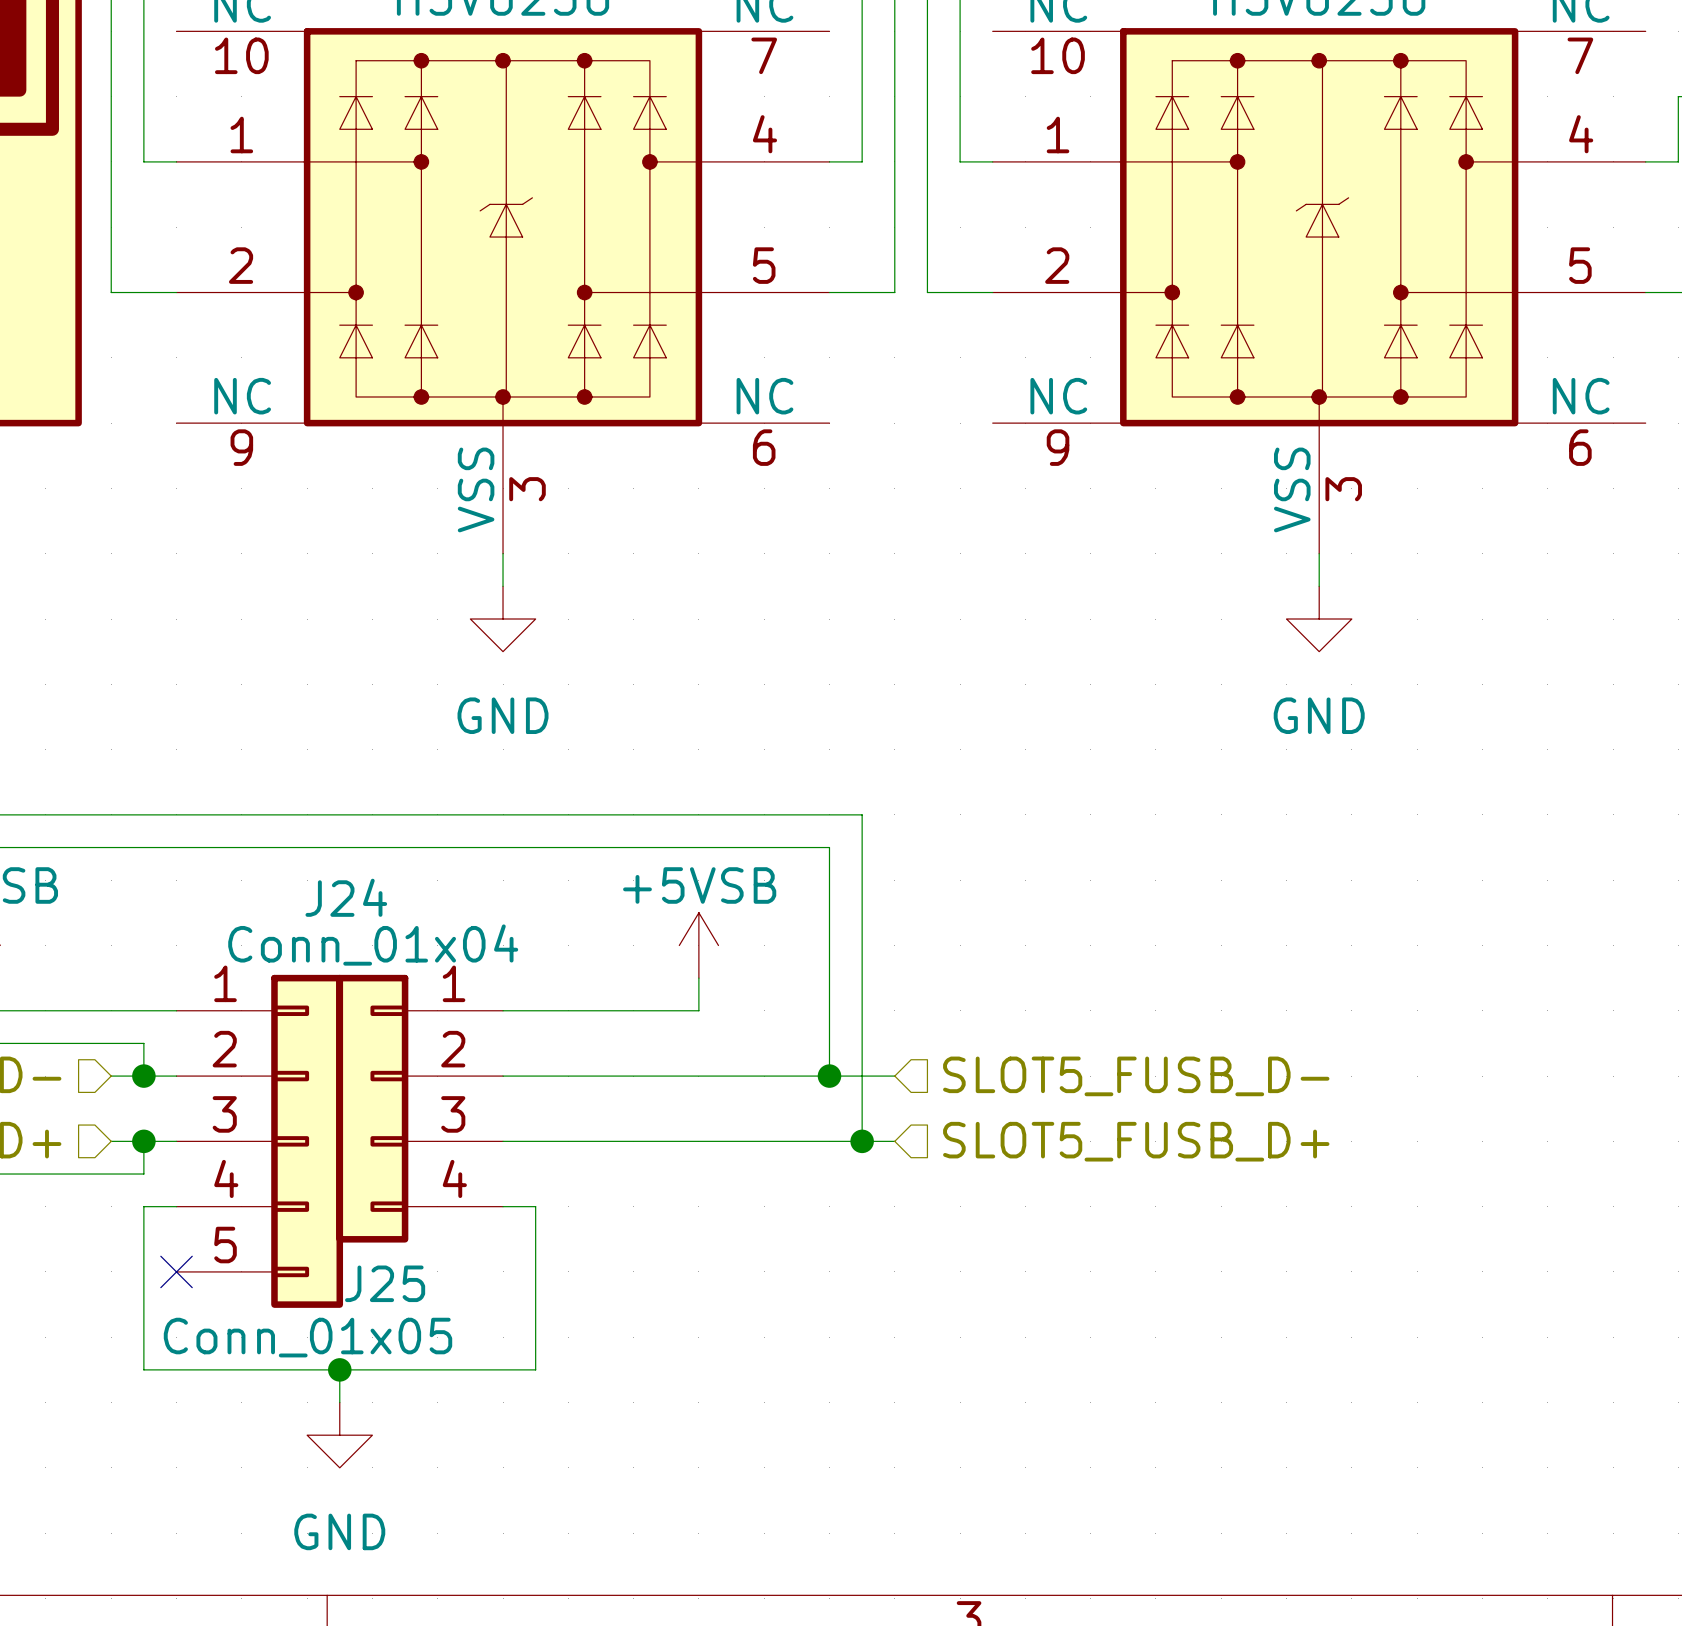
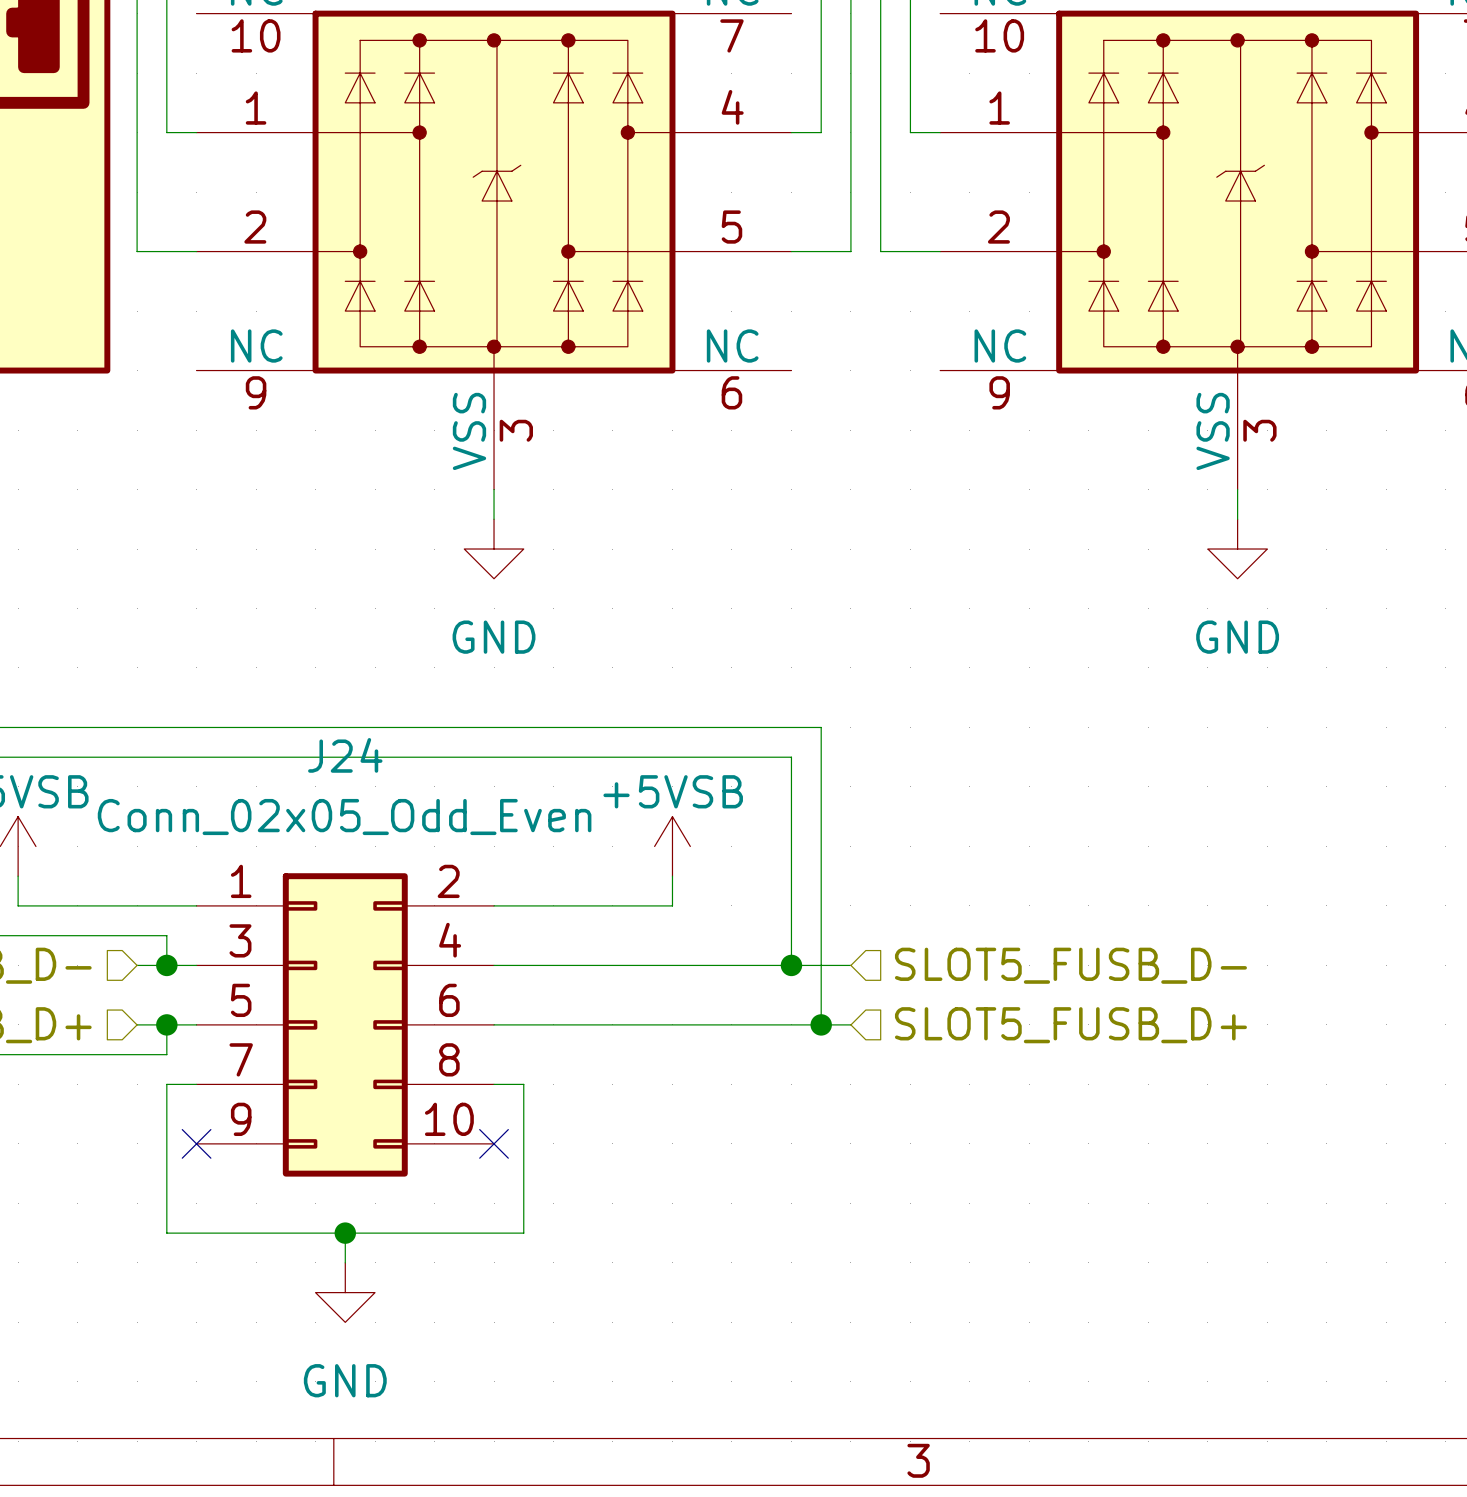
J24 name position: J24 (346, 897) -> J24 (345, 755)
J24 value: Conn_01x04 (373, 945) -> Conn_02x05_Odd_Even (344, 817)
J24 symbol: [336, 974, 504, 1243] -> [196, 873, 495, 1177]
J25: Conn_01x05 (259, 1141) -> none
no-connect mark: none -> (494, 1143)

